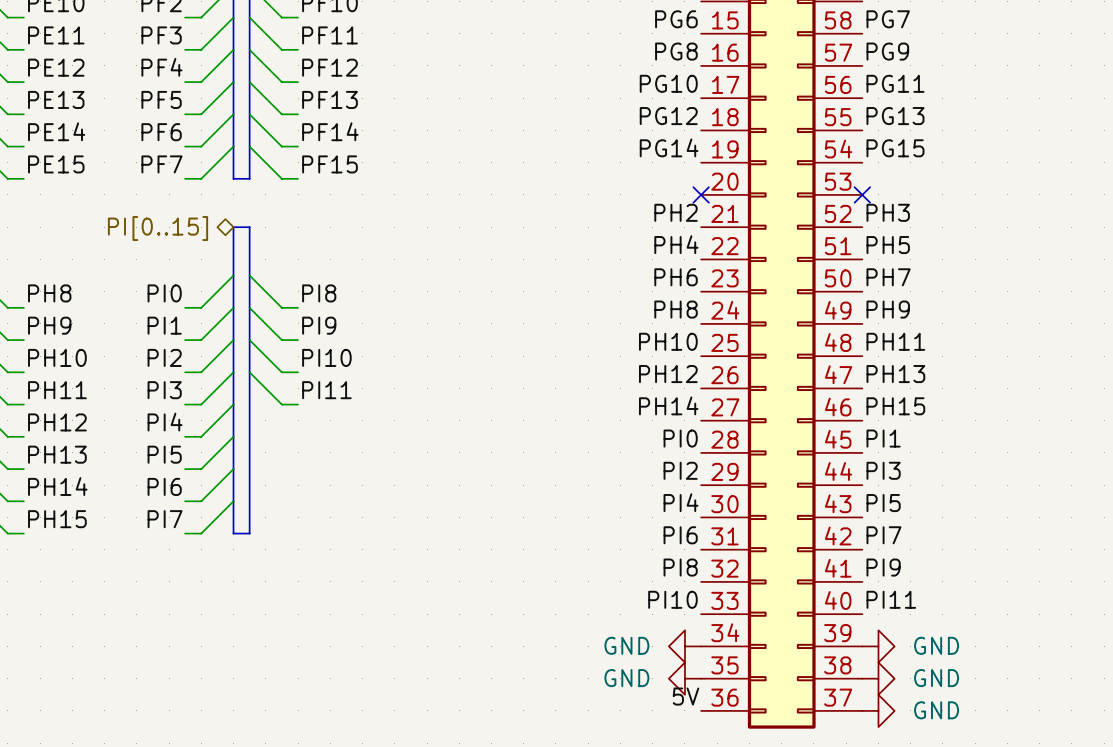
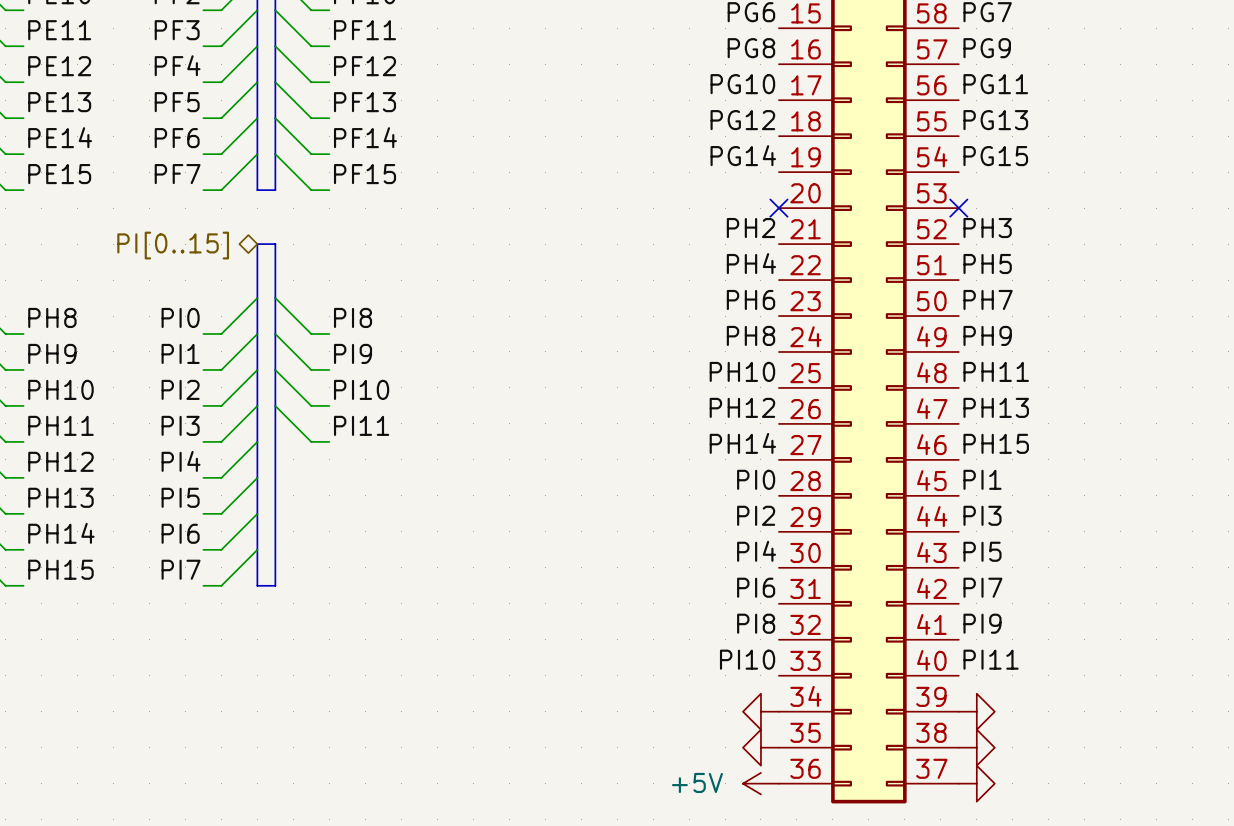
power symbol text: GND (626, 645) -> none
power symbol text: GND (936, 645) -> none
power symbol text: GND (626, 678) -> none
power symbol text: GND (936, 678) -> none
label: 5V (686, 696) -> none
power symbol: none -> +5V (760, 783)
power symbol text: GND (936, 710) -> none

